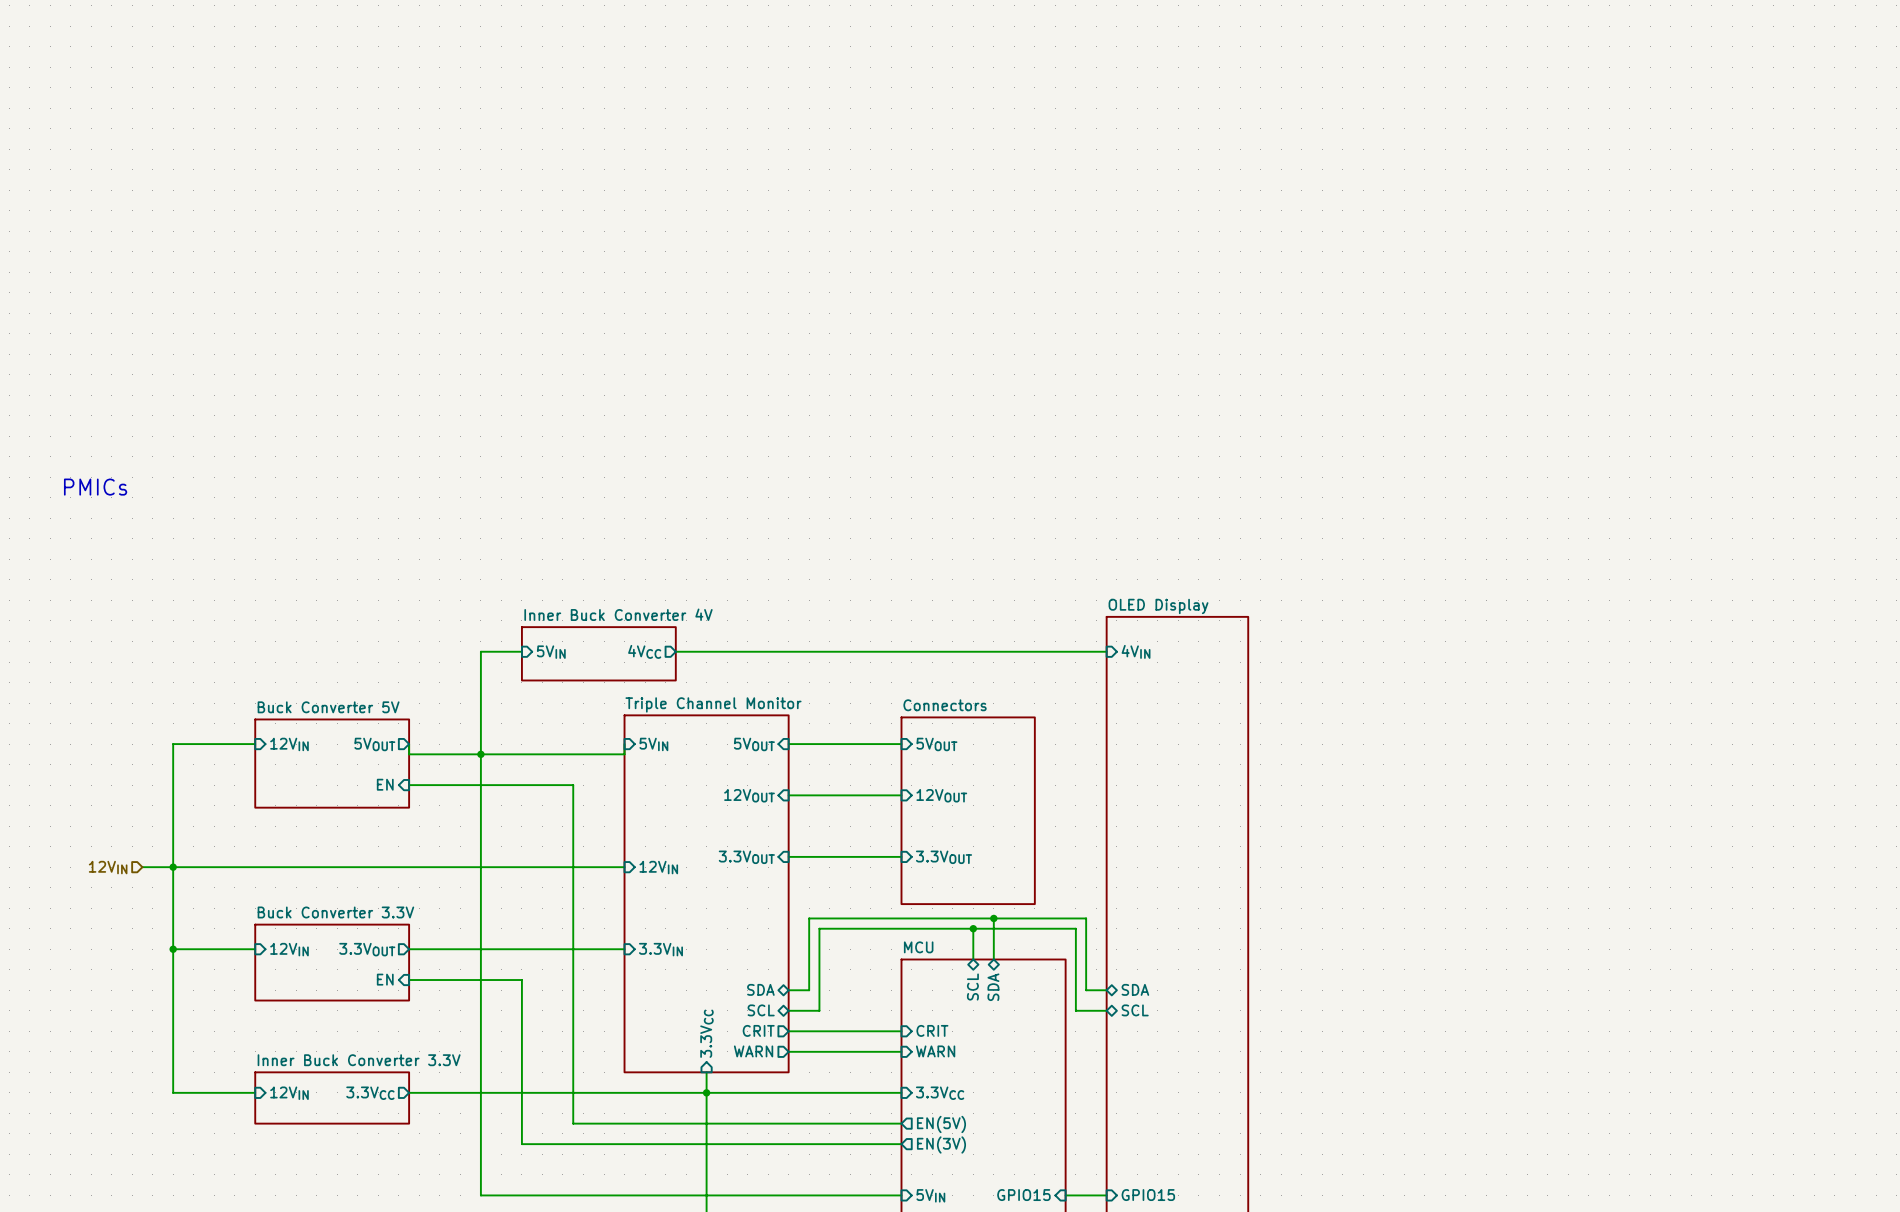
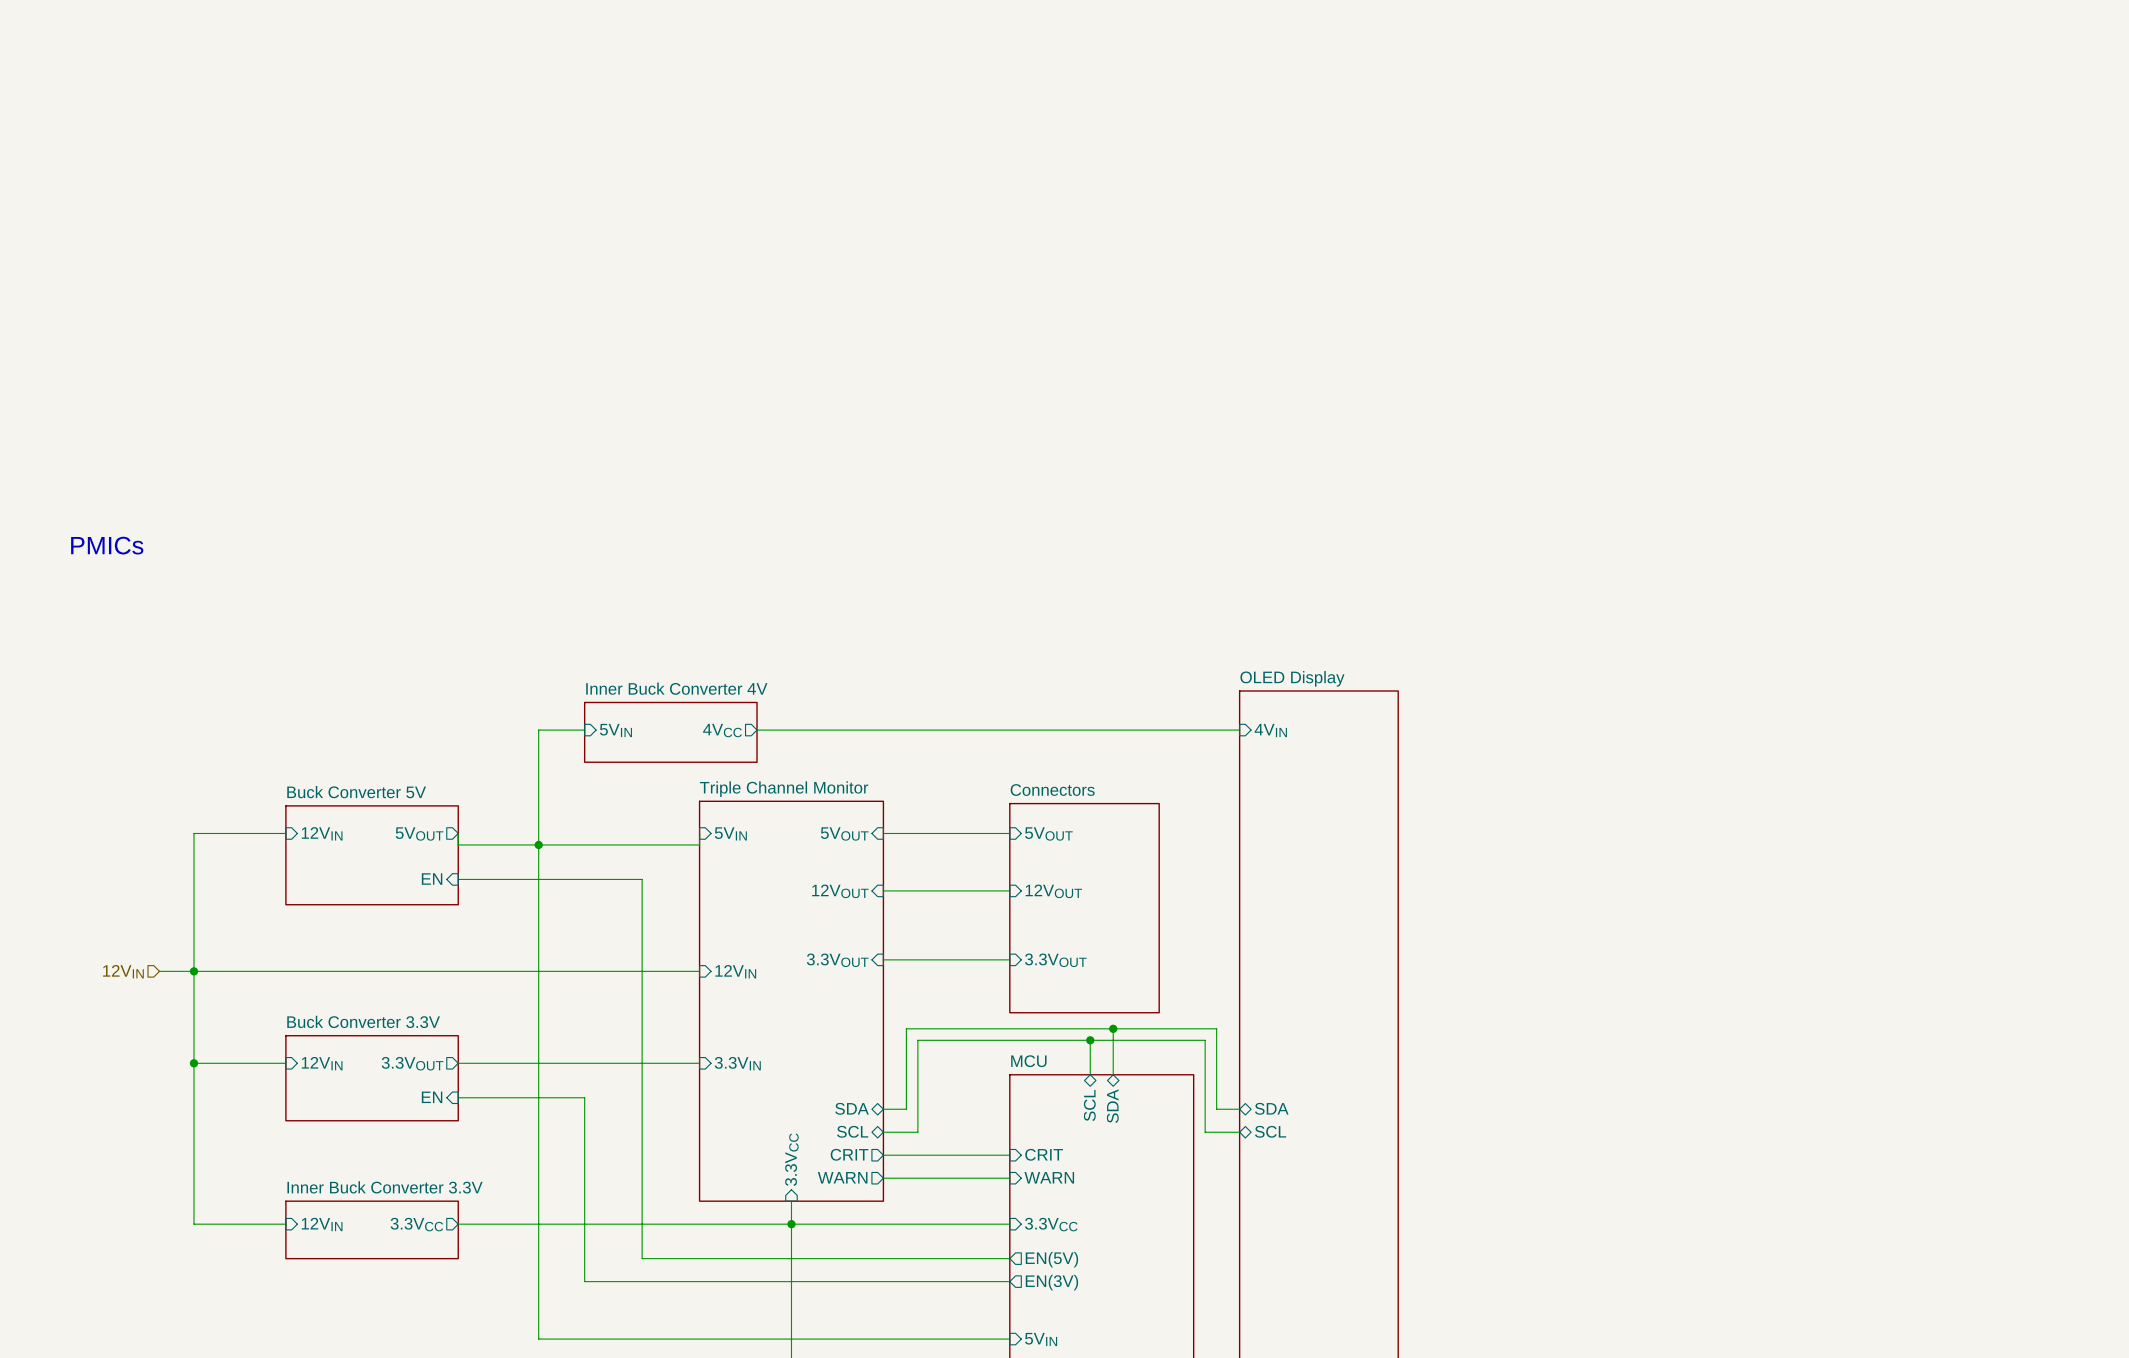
sheet pin: GPIO15 (1023, 1195) -> none
wire: (1065, 1195) (1106, 1195) -> none
sheet pin: GPIO15 (1148, 1195) -> none

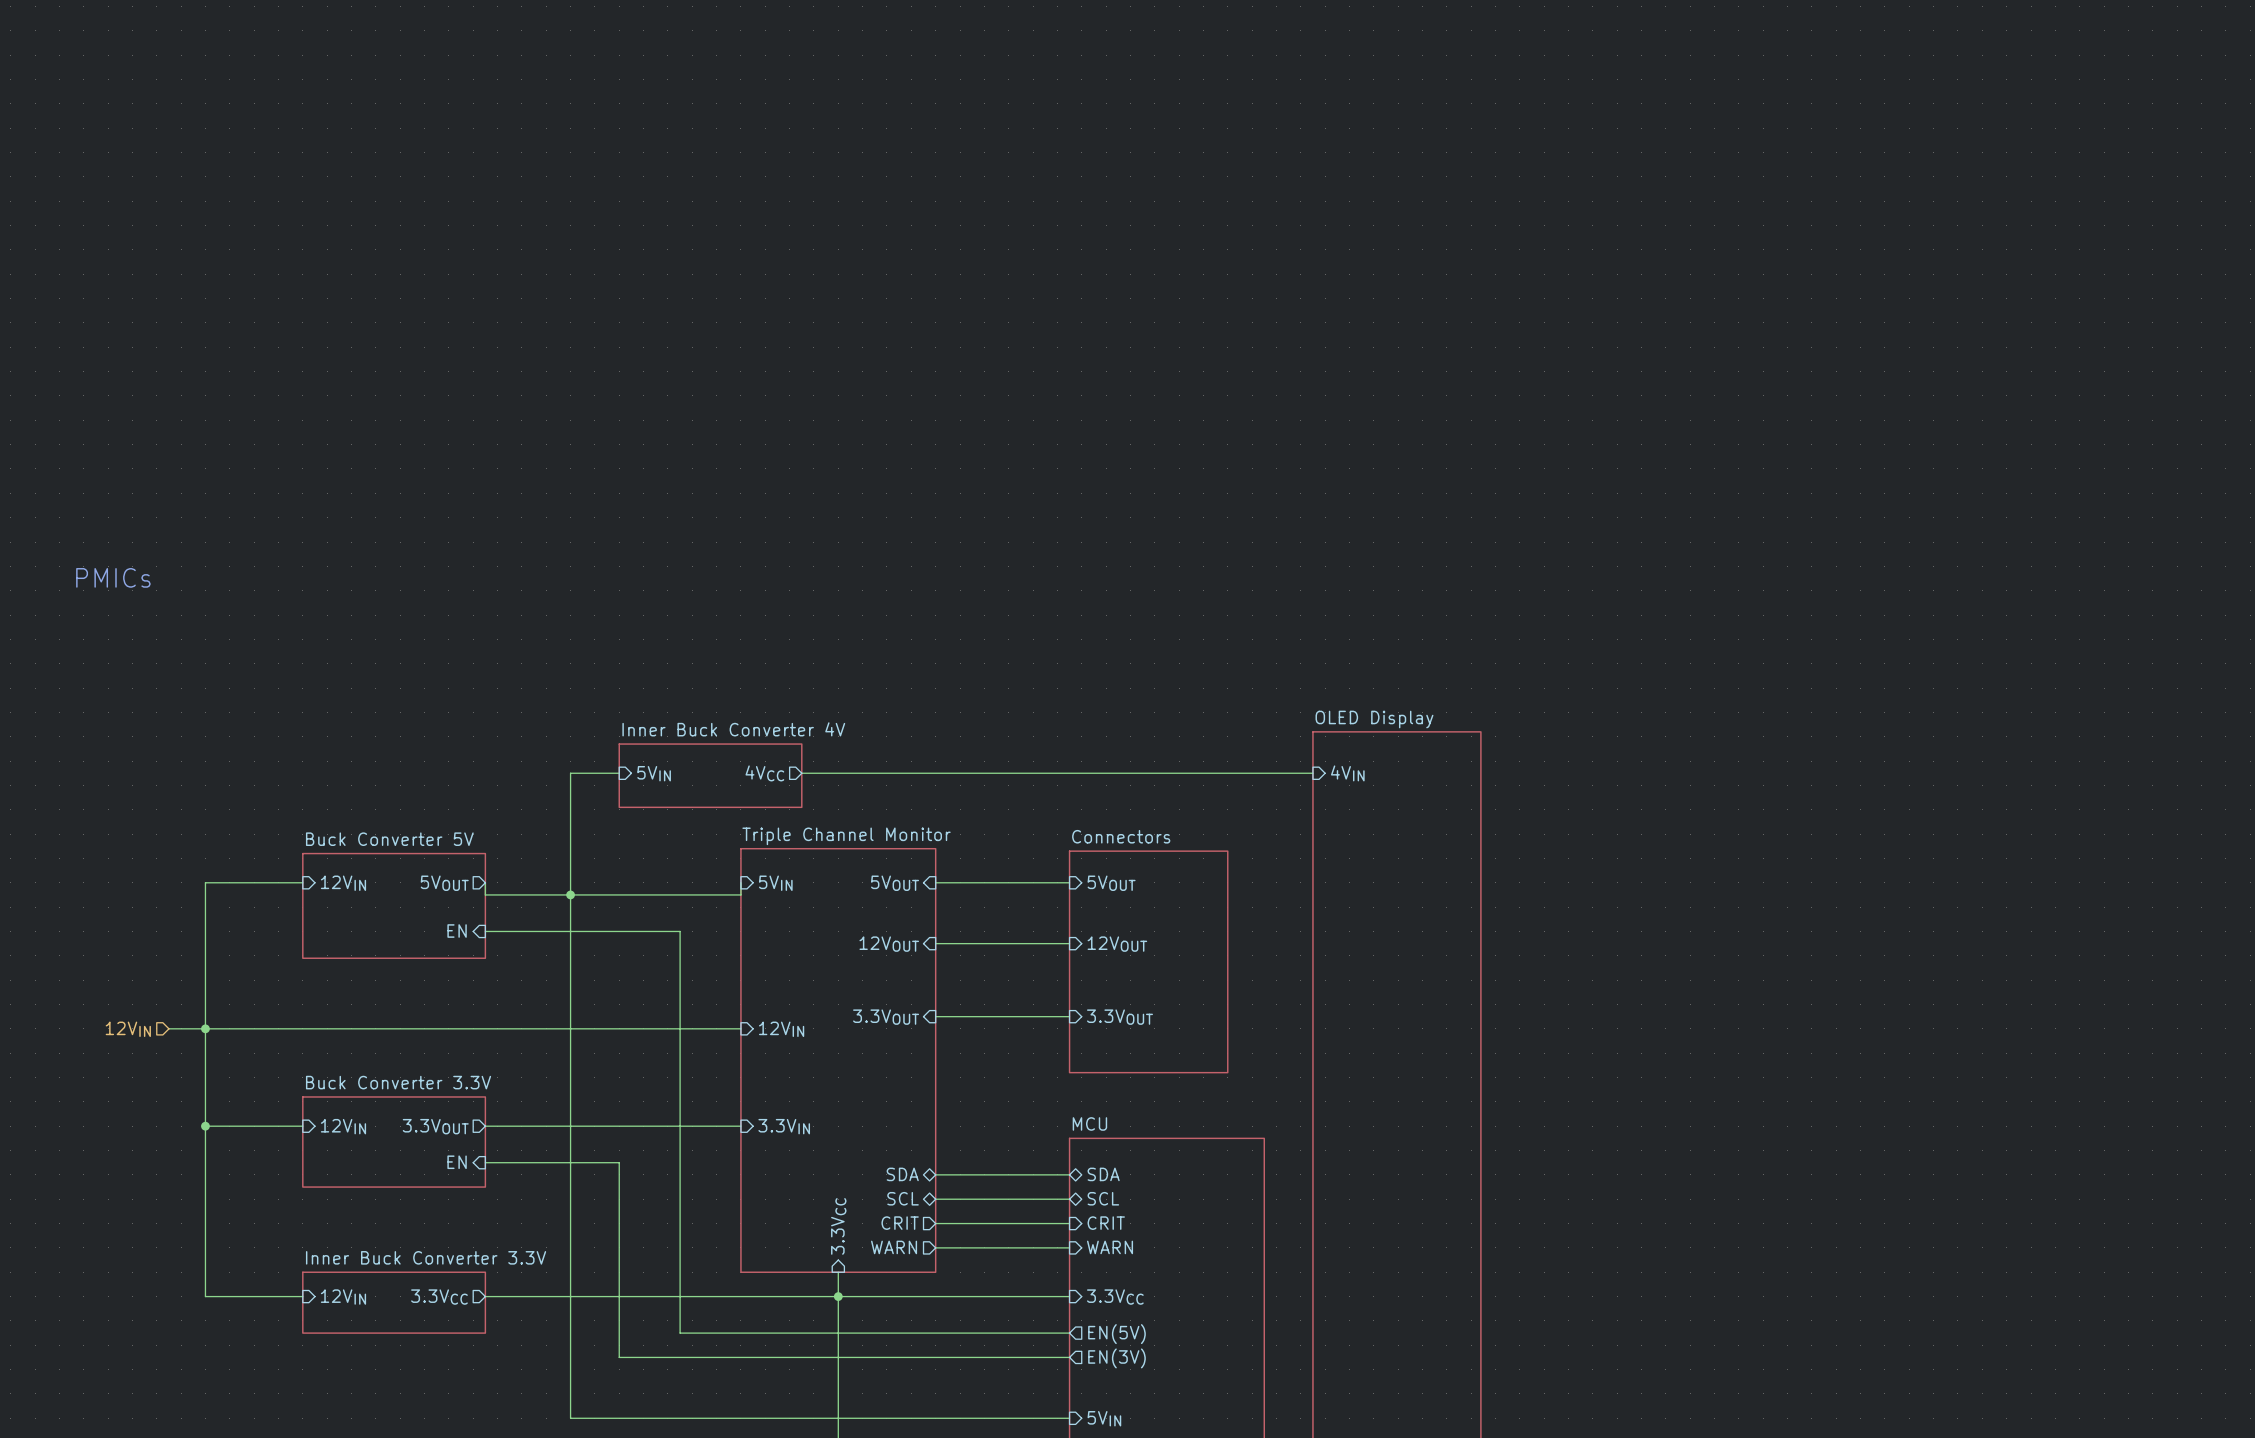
wire: (1113, 1028) (1113, 1074) -> none
junction: (1113, 1028) -> none
wire: (1090, 1040) (1090, 1074) -> none
junction: (1090, 1040) -> none
sheet pin rotation: 0° (1089, 1105) -> 90° counterclockwise (1103, 1198)
sheet pin position: SCL (1089, 1105) -> SCL (1103, 1198)
sheet pin rotation: 0° (1112, 1106) -> 90° counterclockwise (1103, 1174)
sheet pin position: SDA (1112, 1106) -> SDA (1103, 1174)
sheet pin: SDA (1271, 1108) -> none
wire: (906, 1109) (906, 1028) (1216, 1028) (1216, 1109) (1239, 1109) -> (960, 1174) (1069, 1174)
sheet pin: SCL (1270, 1131) -> none
wire: (917, 1132) (917, 1040) (1205, 1040) (1205, 1132) (1239, 1132) -> (972, 1199) (1069, 1199)

